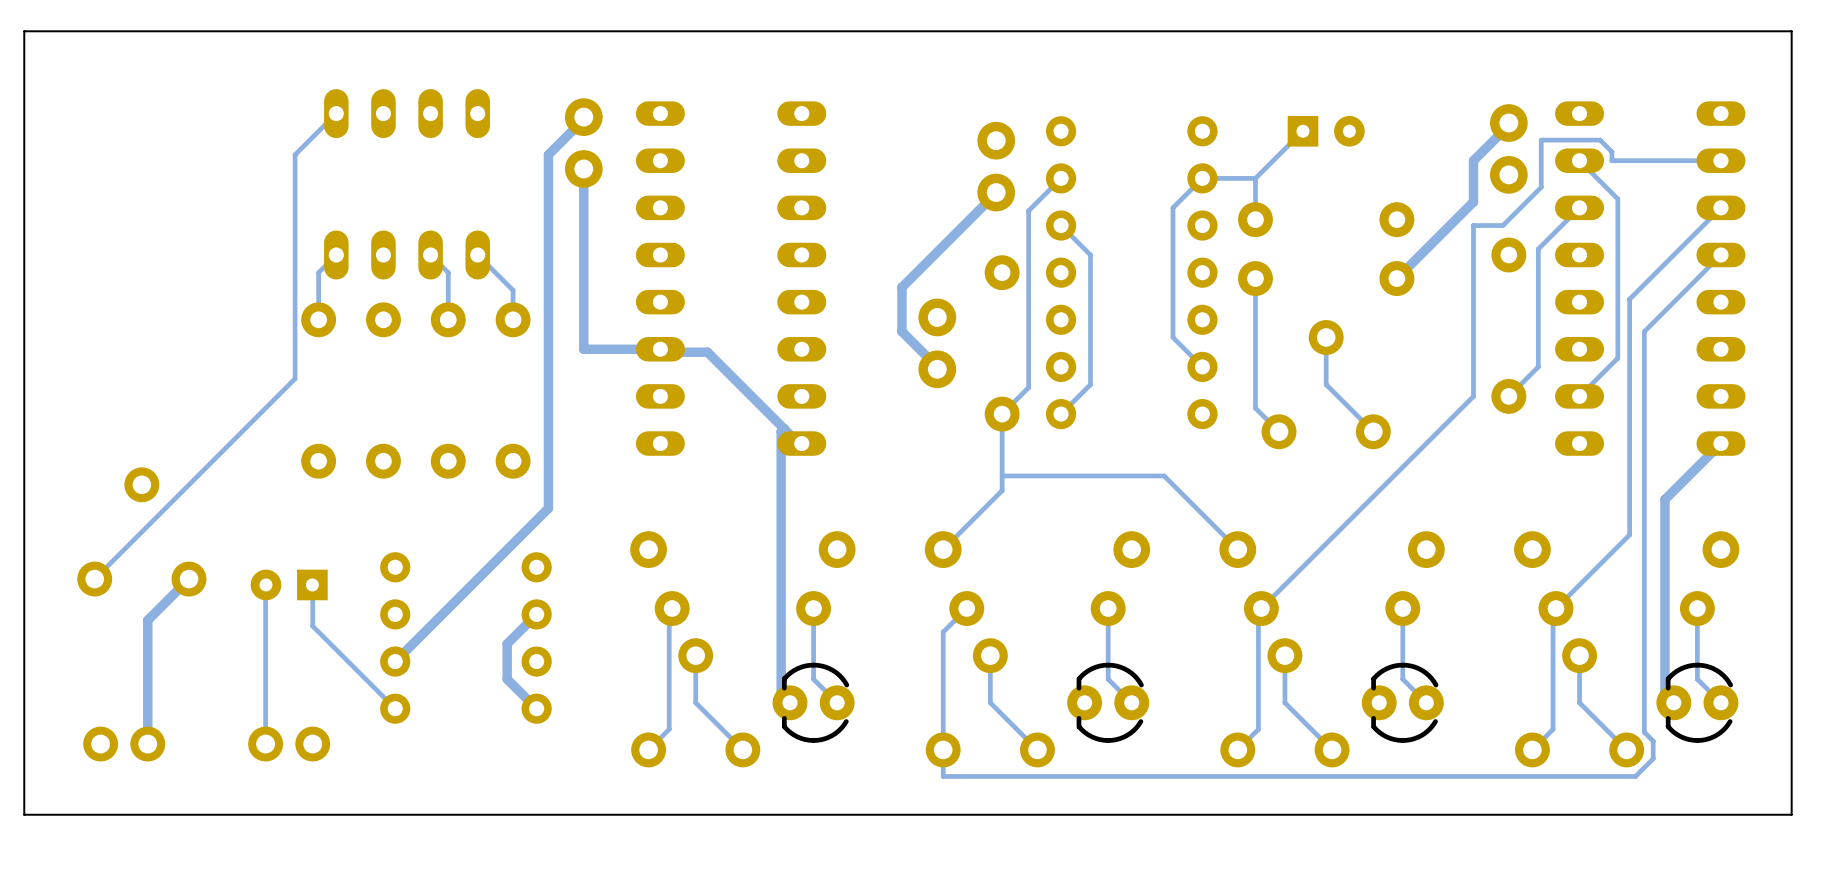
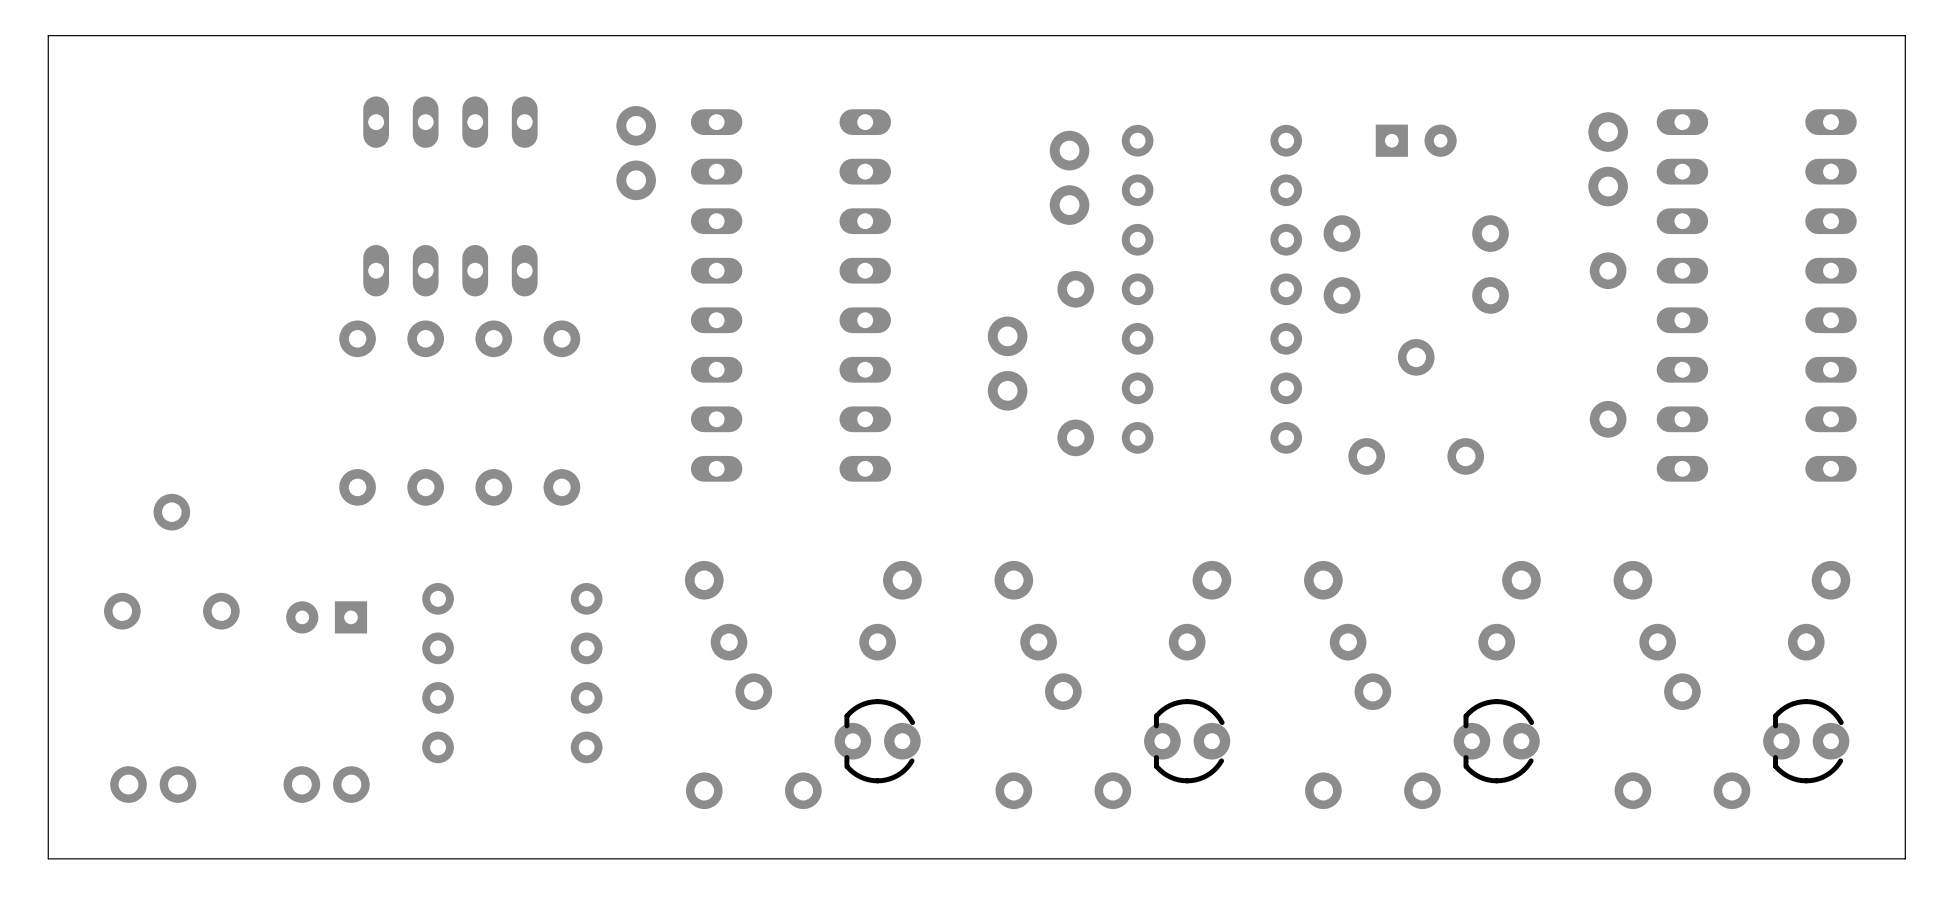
track: (336, 113) (295, 154) (295, 378) (94, 579) -> none
track: (583, 117) (583, 119) (548, 154) (548, 508) (395, 661) -> none
track: (1508, 123) (1508, 125) (1473, 160) (1473, 201) (1396, 278) -> none
track: (1302, 131) (1255, 178) -> none
track: (1579, 160) (1617, 199) (1617, 358) (1579, 396) -> none
track: (1720, 160) (1611, 160) (1611, 151) (1600, 140) (1541, 140) (1541, 187) (1502, 225) (1473, 225) (1473, 396) (1258, 611) (1258, 729) (1237, 749) -> none
track: (583, 168) (583, 349) (660, 349) (663, 352) (707, 352) (798, 443) (801, 443) -> none
track: (1061, 178) (1028, 210) (1028, 387) (1002, 414) (1002, 490) (943, 549) -> none
track: (1255, 178) (1255, 219) -> none
track: (1255, 178) (1202, 178) (1173, 207) (1173, 337) (1202, 366) -> none
track: (996, 192) (901, 287) (901, 331) (937, 366) (937, 369) -> none
track: (1579, 207) (1538, 249) (1538, 366) (1508, 396) -> none
track: (1720, 207) (1629, 299) (1629, 534) (1553, 611) (1553, 729) (1532, 749) -> none
track: (1061, 225) (1090, 255) (1090, 384) (1061, 414) -> none
track: (336, 255) (318, 272) (318, 319) -> none
track: (430, 255) (448, 272) (448, 319) -> none
track: (477, 255) (513, 290) (513, 319) -> none
track: (1720, 255) (1644, 331) (1644, 732) (1653, 741) (1653, 758) (1635, 776) (943, 776) (943, 632) (966, 608) -> none
track: (1255, 278) (1255, 408) (1279, 431) -> none
track: (1326, 337) (1326, 384) (1373, 431) -> none
track: (784, 428) (781, 431) (781, 693) (790, 702) -> none
track: (1720, 443) (1664, 499) (1664, 693) (1673, 702) -> none
track: (1002, 475) (1164, 475) (1237, 549) -> none
track: (189, 579) (147, 620) (147, 744) -> none
track: (265, 584) (265, 744) -> none
track: (312, 584) (312, 626) (395, 708) -> none
track: (672, 608) (669, 611) (669, 729) (648, 749) -> none
track: (813, 608) (813, 679) (837, 702) -> none
track: (1108, 608) (1108, 679) (1131, 702) -> none
track: (1402, 608) (1402, 679) (1426, 702) -> none
track: (1697, 608) (1697, 679) (1720, 702) -> none
track: (536, 614) (507, 643) (507, 679) (536, 708) -> none
track: (695, 655) (695, 702) (742, 749) -> none
track: (990, 655) (990, 702) (1037, 749) -> none
track: (1284, 655) (1284, 702) (1332, 749) -> none
track: (1579, 655) (1579, 702) (1626, 749) -> none

